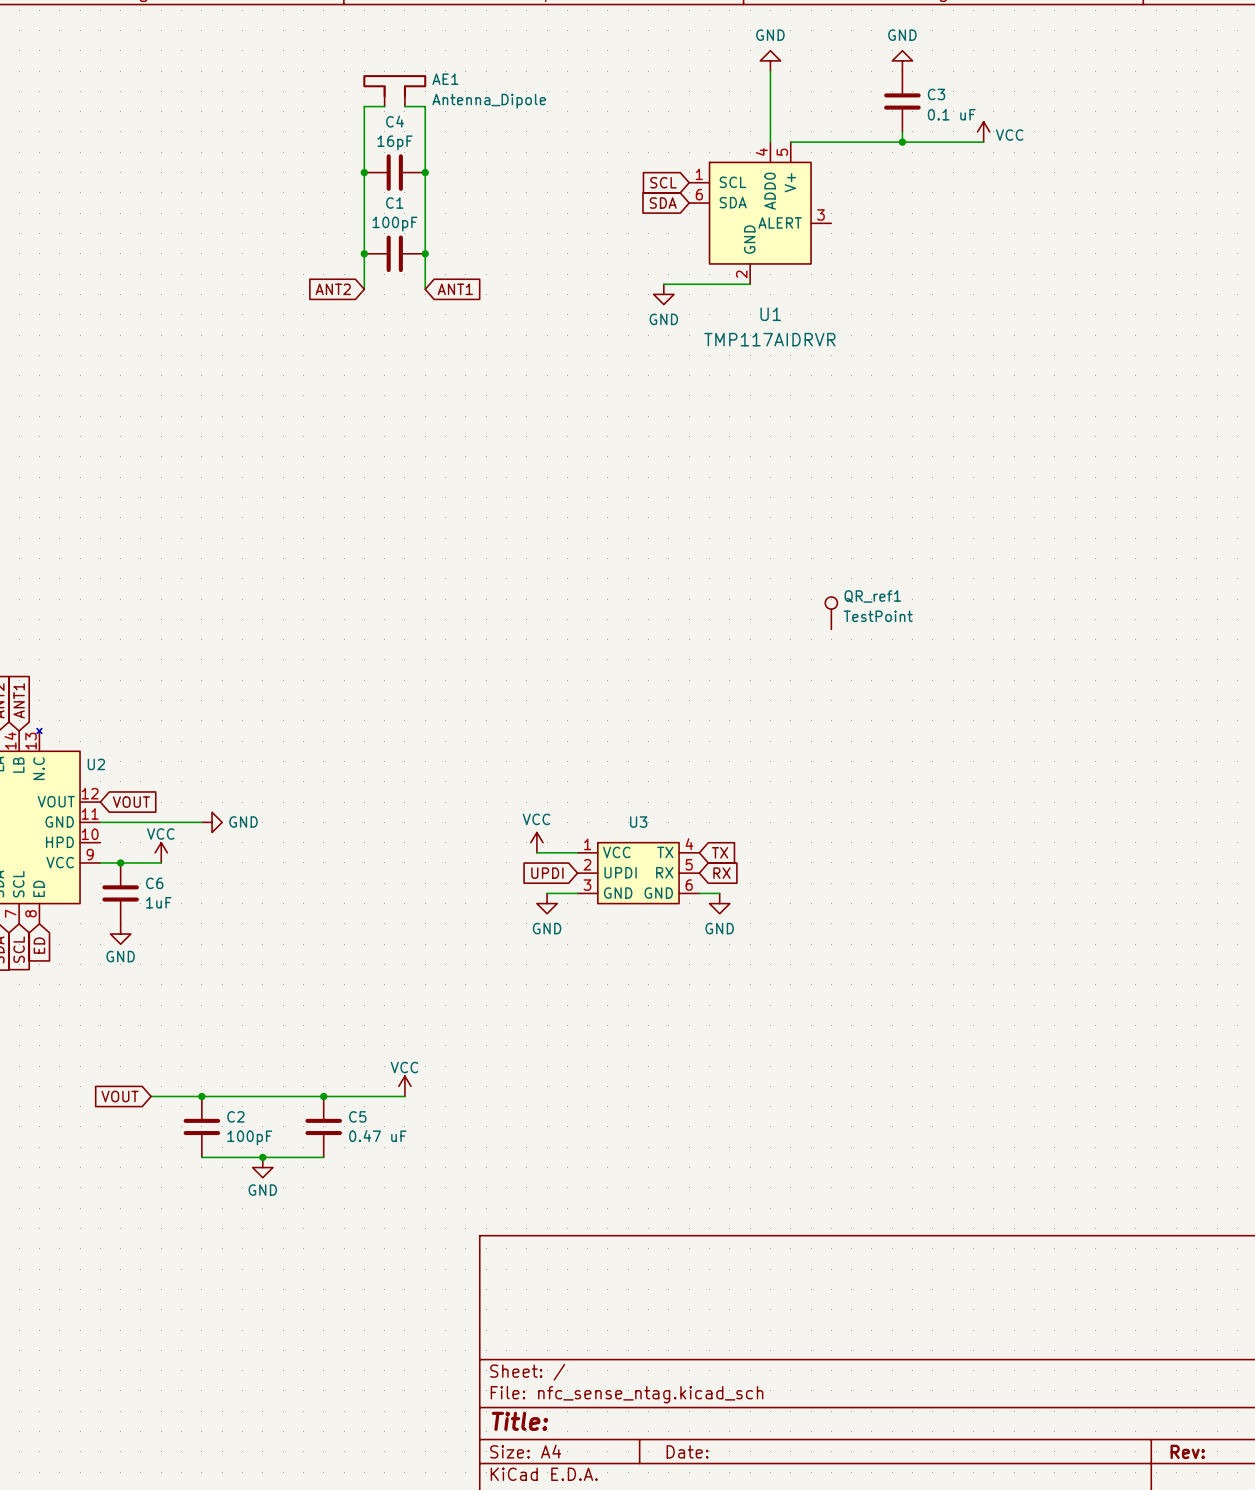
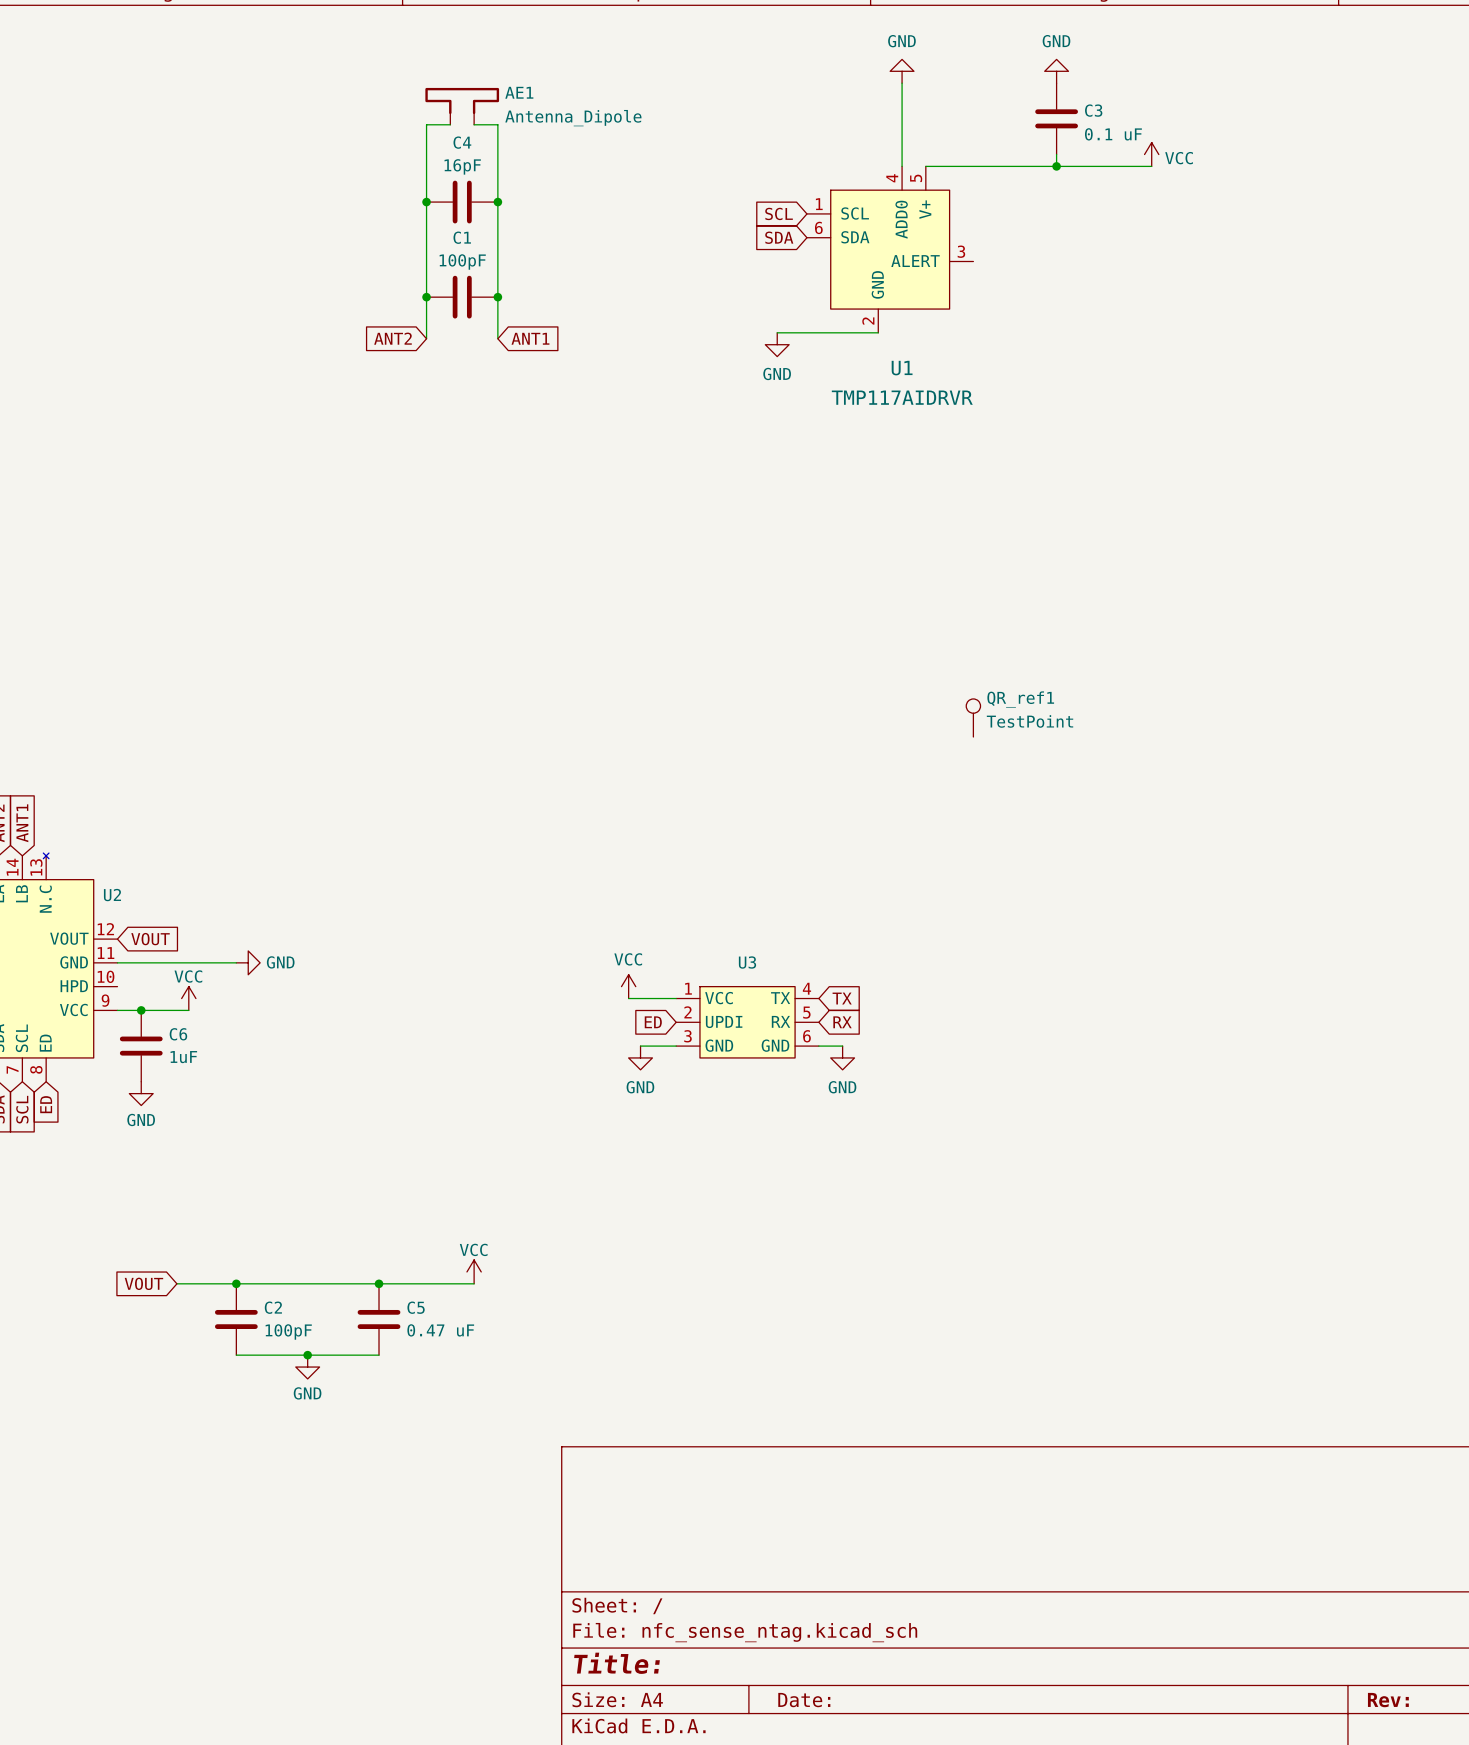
global label: UPDI (547, 873) -> ED (653, 1022)

